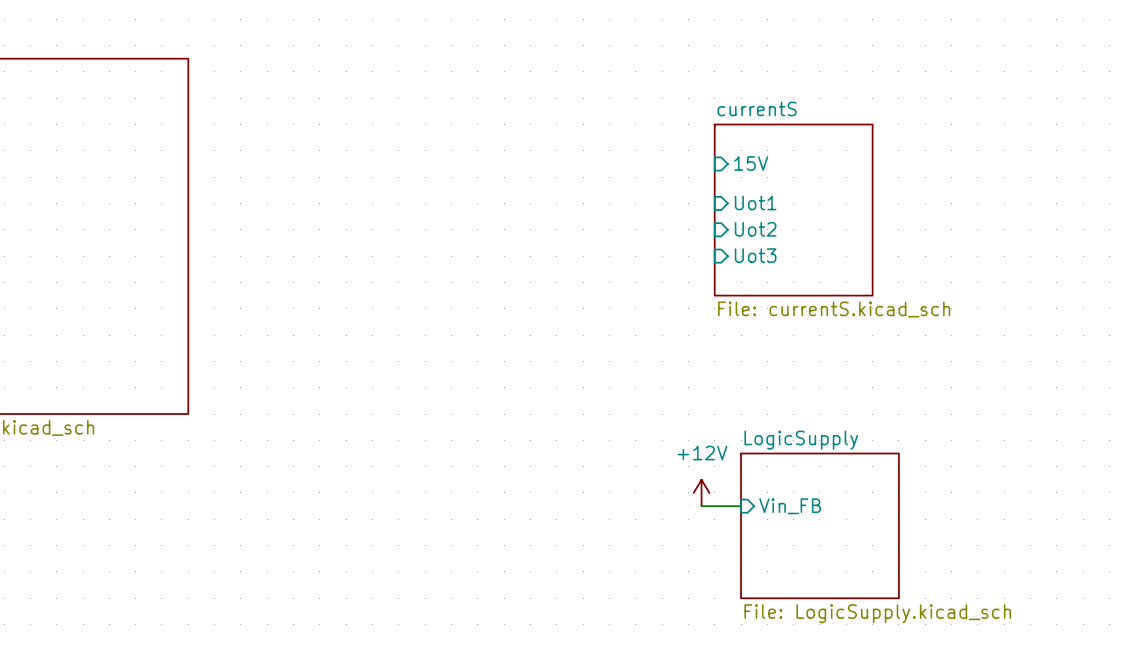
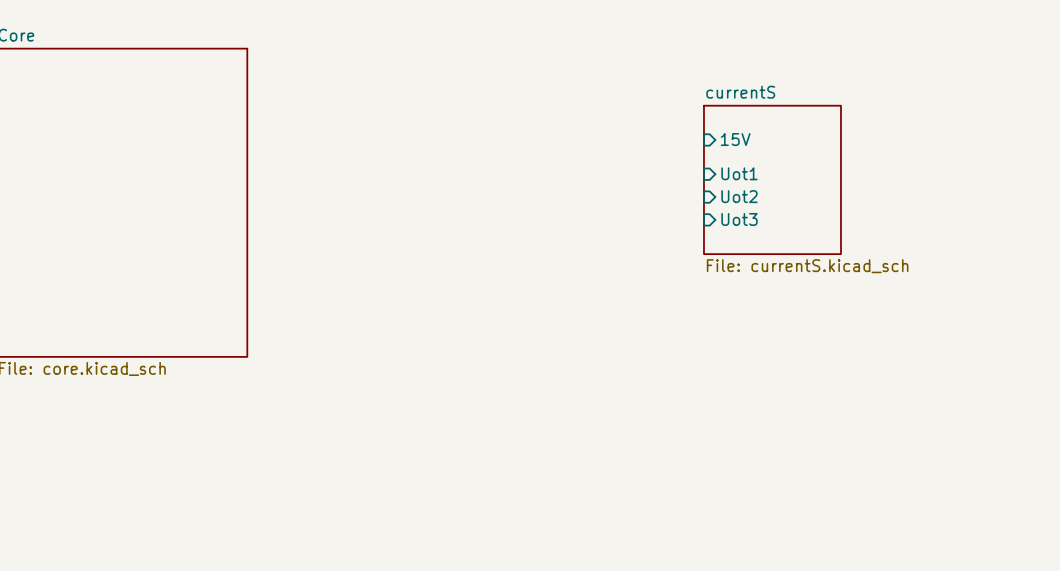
power symbol: +12V (701, 492) -> none
wire: (701, 506) (741, 506) -> none
sheet pin: Vin_FB (790, 506) -> none
sheet LogicSupply: File: LogicSupply.kicad_sch (819, 525) -> none

